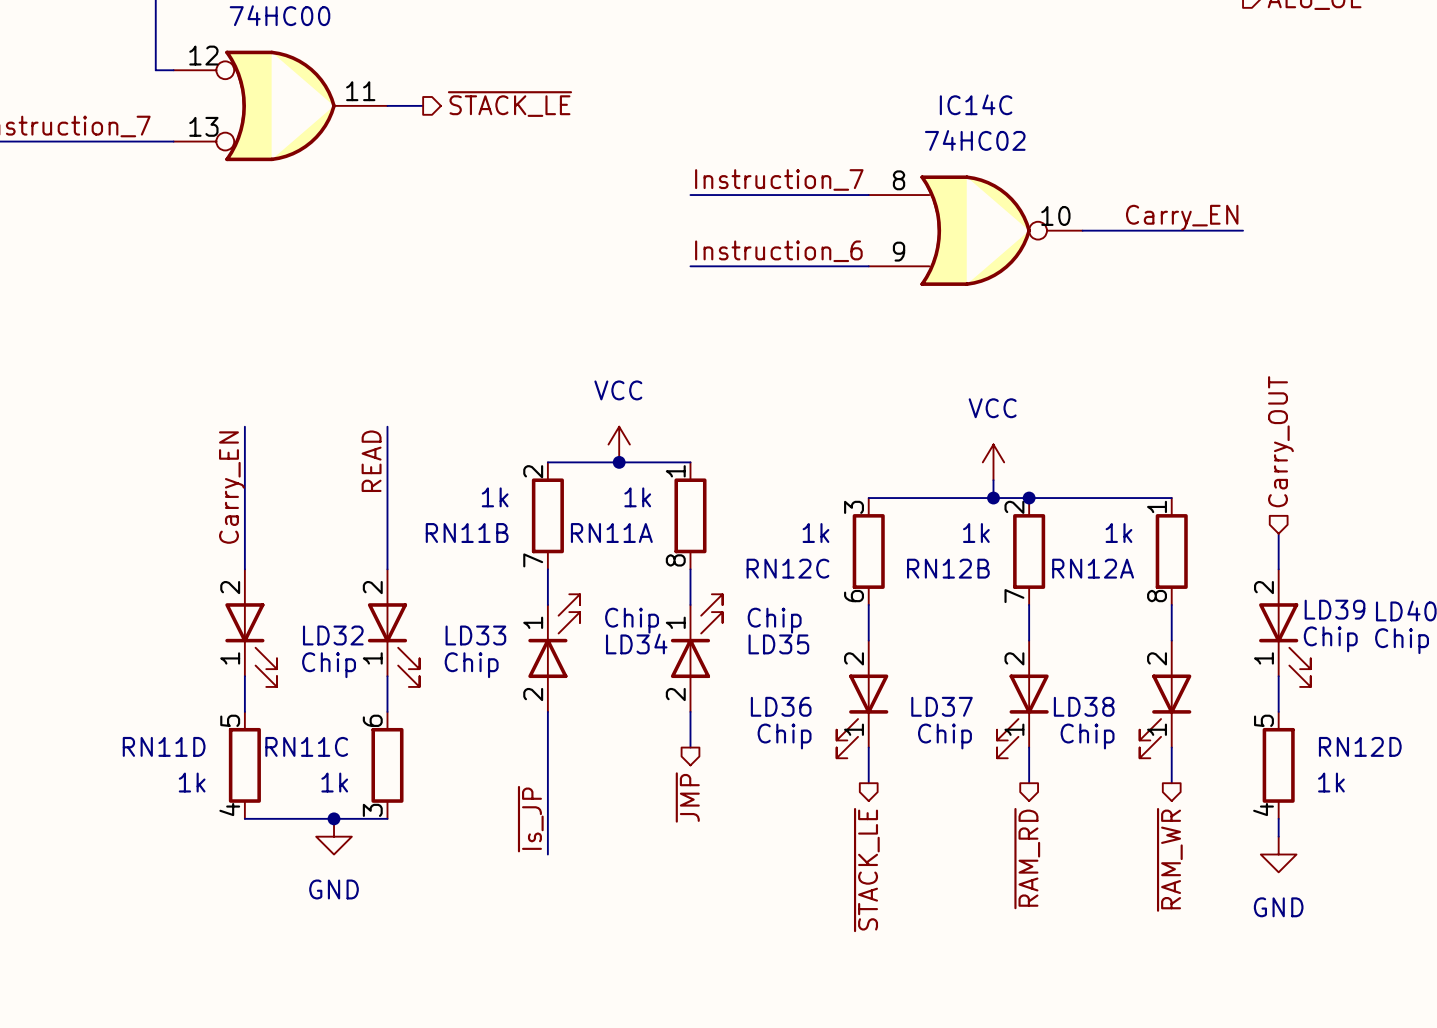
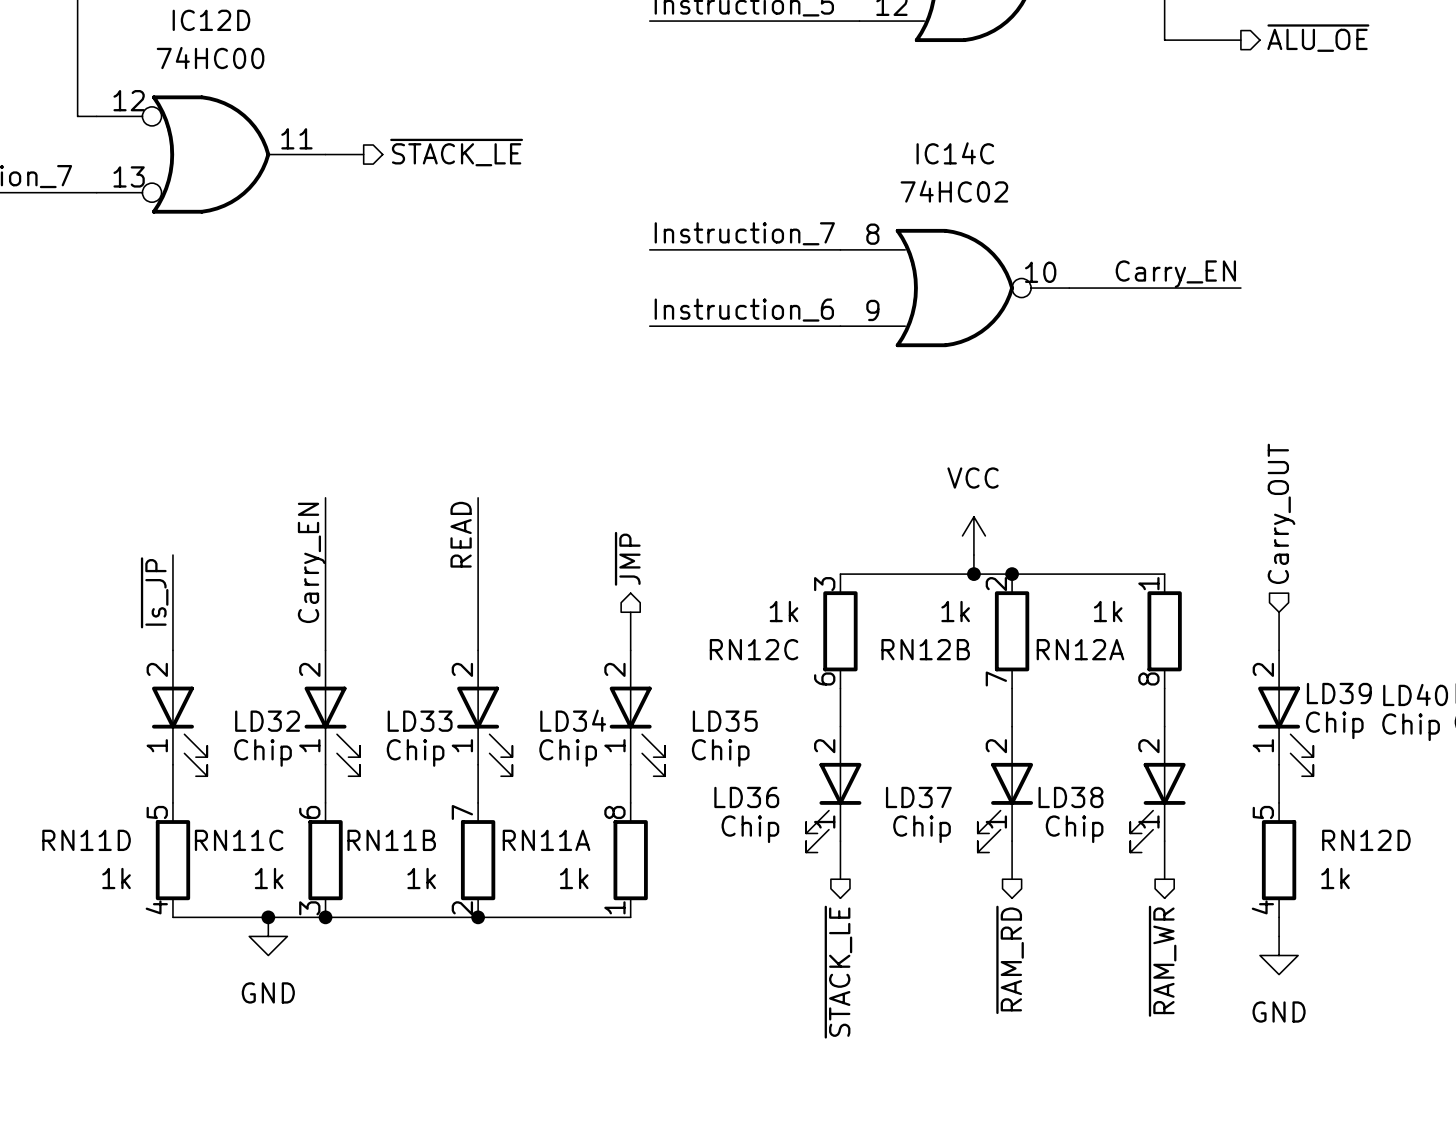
wire: (244, 426) (244, 480) -> none
power symbol: VCC (619, 444) -> none
label: READ (371, 461) -> Carry_EN (311, 562)
label: none -> READ (461, 534)
wire: (547, 462) (690, 462) -> none
junction: (619, 462) -> none
label: Carry_EN (231, 487) -> none
RN11B value position: 1k (495, 497) -> 1k (421, 878)
RN11A value position: 1k (637, 497) -> 1k (574, 878)
label: none -> ~{Is_JP} (154, 592)
RN11B rotation: 0° (547, 515) -> 180° (478, 860)
RN11B position: (547, 515) -> (478, 860)
RN11A rotation: 0° (690, 515) -> 180° (630, 860)
RN11A position: (690, 515) -> (630, 860)
RN11B name position: RN11B (467, 533) -> RN11B (391, 840)
RN11A name position: RN11A (611, 533) -> RN11A (546, 840)
wire: (547, 569) (547, 604) -> (478, 764) (478, 802)
wire: (690, 569) (690, 604) -> (630, 612) (630, 650)
LD34 flip: as is (554, 636) -> up-down (484, 731)
LD35 flip: as is (696, 636) -> up-down (637, 731)
wire: (547, 711) (547, 854) -> (478, 497) (478, 650)
wire: (690, 711) (690, 747) -> (630, 764) (630, 802)
hierarchical label rotation: 0° (687, 797) -> 180° (627, 558)
hierarchical label position: ~{JMP} (687, 797) -> ~{JMP} (627, 558)
wire: none -> (325, 917) (630, 917)
junction: none -> (325, 917)
junction: none -> (478, 917)
label: ~{Is_JP} (530, 819) -> none

